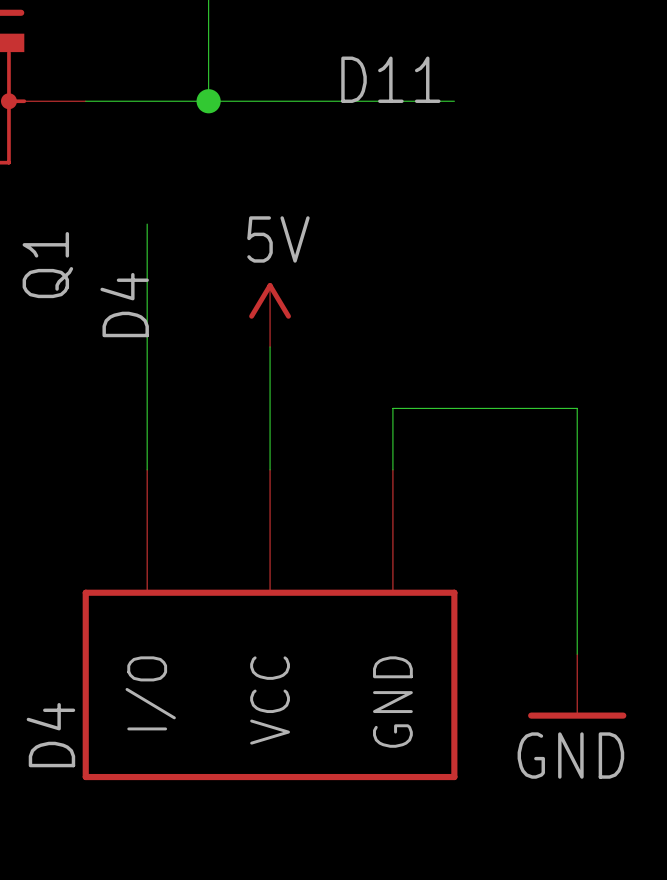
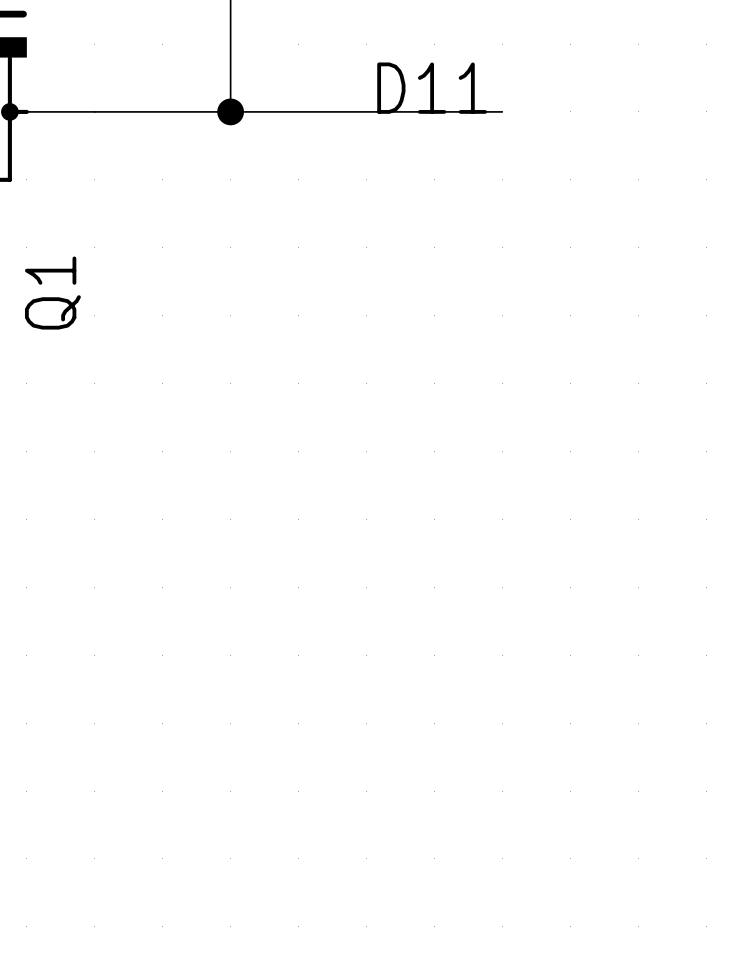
wire: (147, 224) (147, 469) -> none
label: D4 (124, 305) -> none
power symbol: 5V (270, 315) -> none
wire: (270, 346) (270, 469) -> none
wire: (392, 469) (392, 408) (577, 408) (577, 654) -> none
D4: (270, 624) -> none
power symbol: GND (577, 686) -> none

